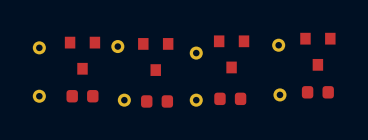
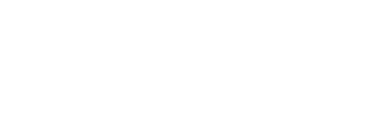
part: (278, 45) -> none
part: (117, 46) -> none
part: (39, 47) -> none
part: (317, 51) -> none
part: (196, 53) -> none
part: (231, 54) -> none
part: (82, 55) -> none
part: (155, 57) -> none
part: (317, 92) -> none
part: (279, 94) -> none
part: (39, 96) -> none
part: (82, 96) -> none
part: (230, 98) -> none
part: (124, 100) -> none
part: (196, 100) -> none
part: (157, 101) -> none

